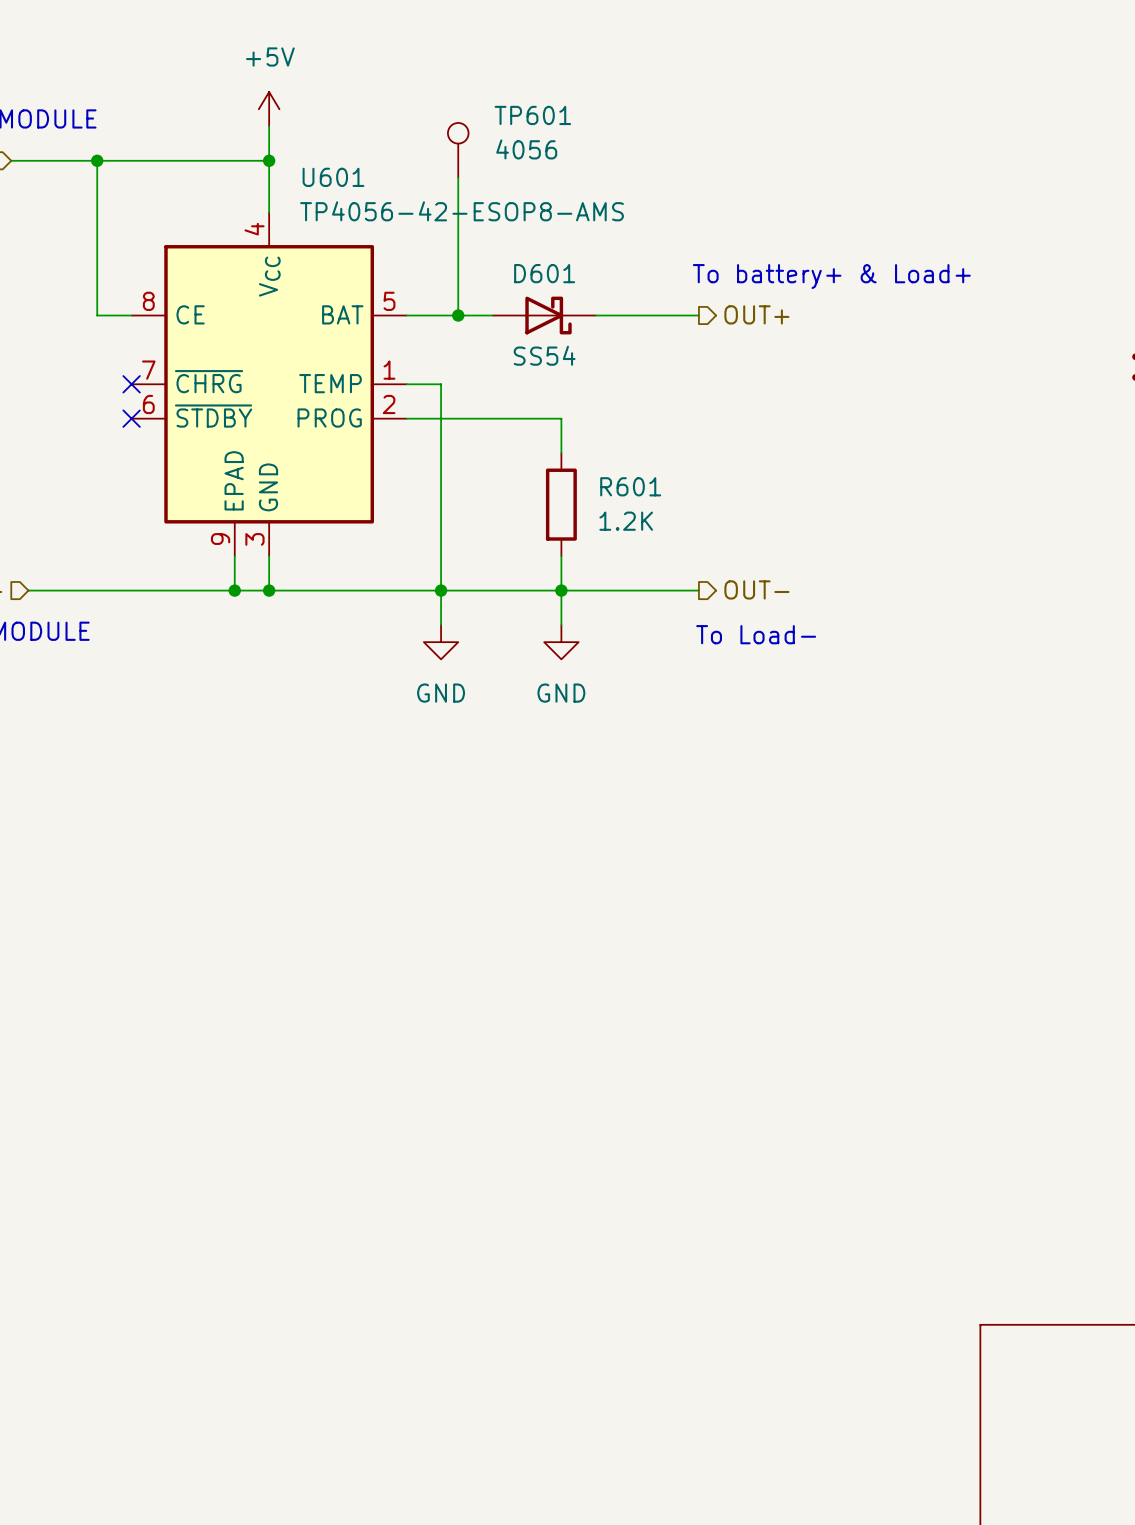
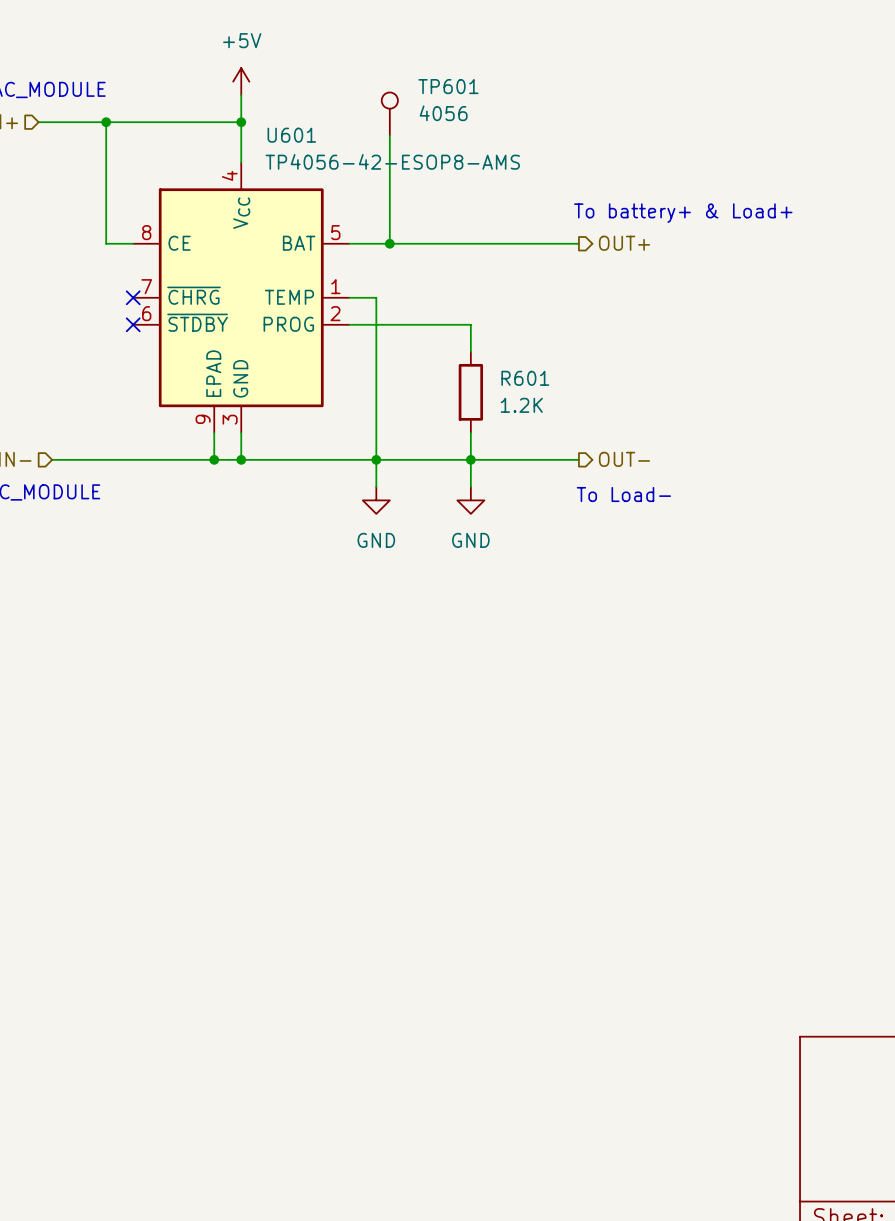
D601: SS54 (544, 315) -> none

